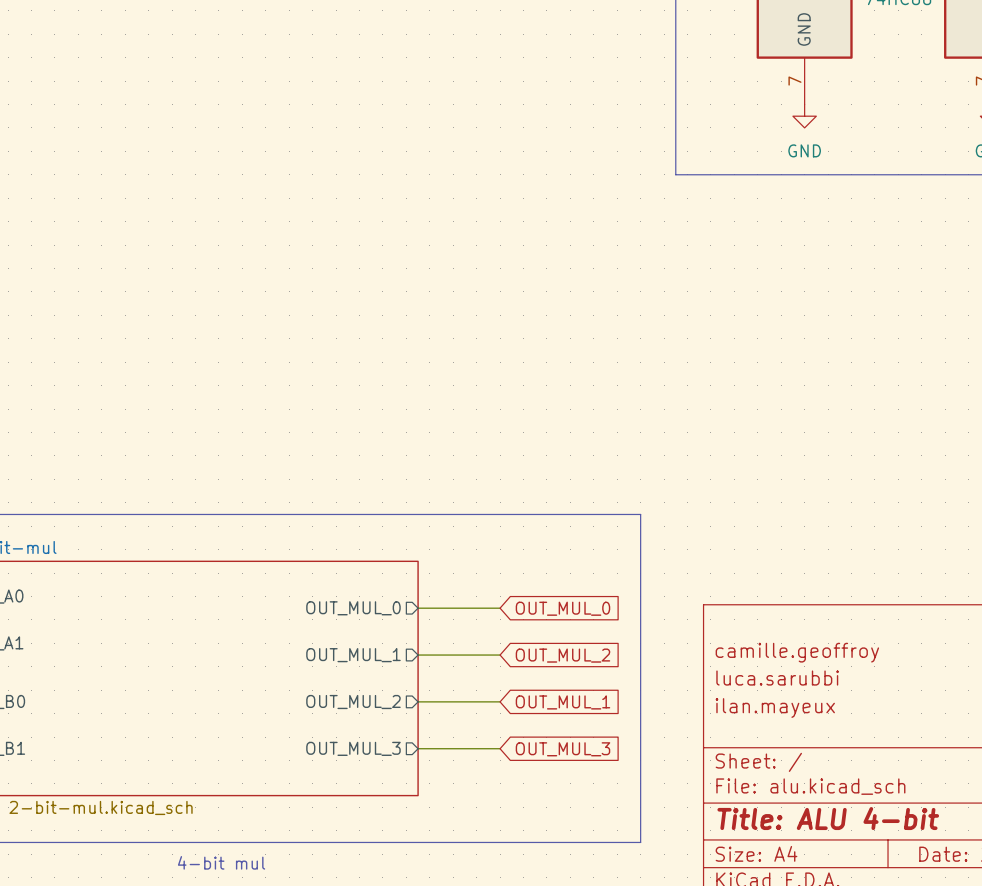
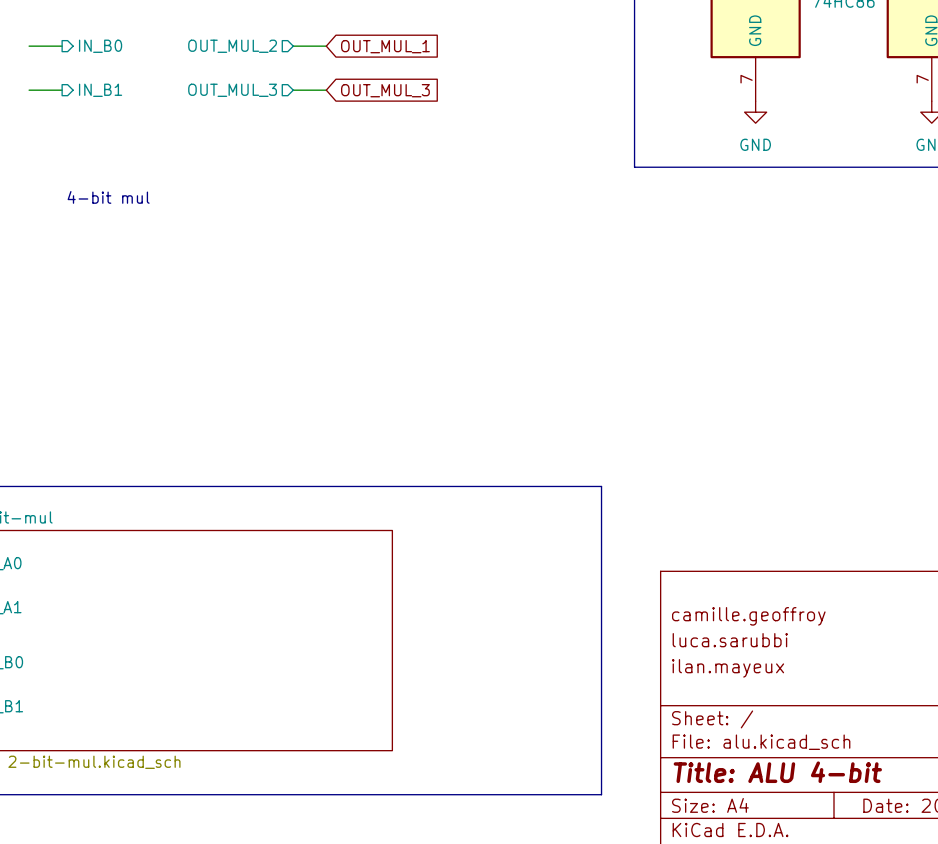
wire: none -> (29, 46) (62, 46)
wire: none -> (293, 46) (326, 46)
sheet pin: none -> IN_B0 (100, 46)
sheet pin: none -> OUT_MUL_2 (232, 46)
global label: none -> OUT_MUL_1 (385, 46)
wire: none -> (29, 90) (62, 90)
sheet pin: none -> IN_B1 (100, 90)
sheet pin: none -> OUT_MUL_3 (232, 90)
wire: none -> (293, 90) (326, 90)
global label: none -> OUT_MUL_3 (385, 90)
text: none -> 4-bit mul (108, 197)
sheet pin: OUT_MUL_0 (353, 608) -> none
wire: (418, 608) (500, 608) -> none
global label: OUT_MUL_0 (562, 608) -> none
sheet pin: OUT_MUL_1 (353, 655) -> none
wire: (418, 655) (500, 655) -> none
global label: OUT_MUL_2 (562, 655) -> none
wire: (418, 701) (500, 701) -> none
sheet pin: OUT_MUL_2 (353, 702) -> none
global label: OUT_MUL_1 (562, 702) -> none
sheet pin: OUT_MUL_3 (353, 748) -> none
wire: (418, 748) (500, 748) -> none
global label: OUT_MUL_3 (562, 749) -> none
text: 4-bit mul (221, 862) -> none

